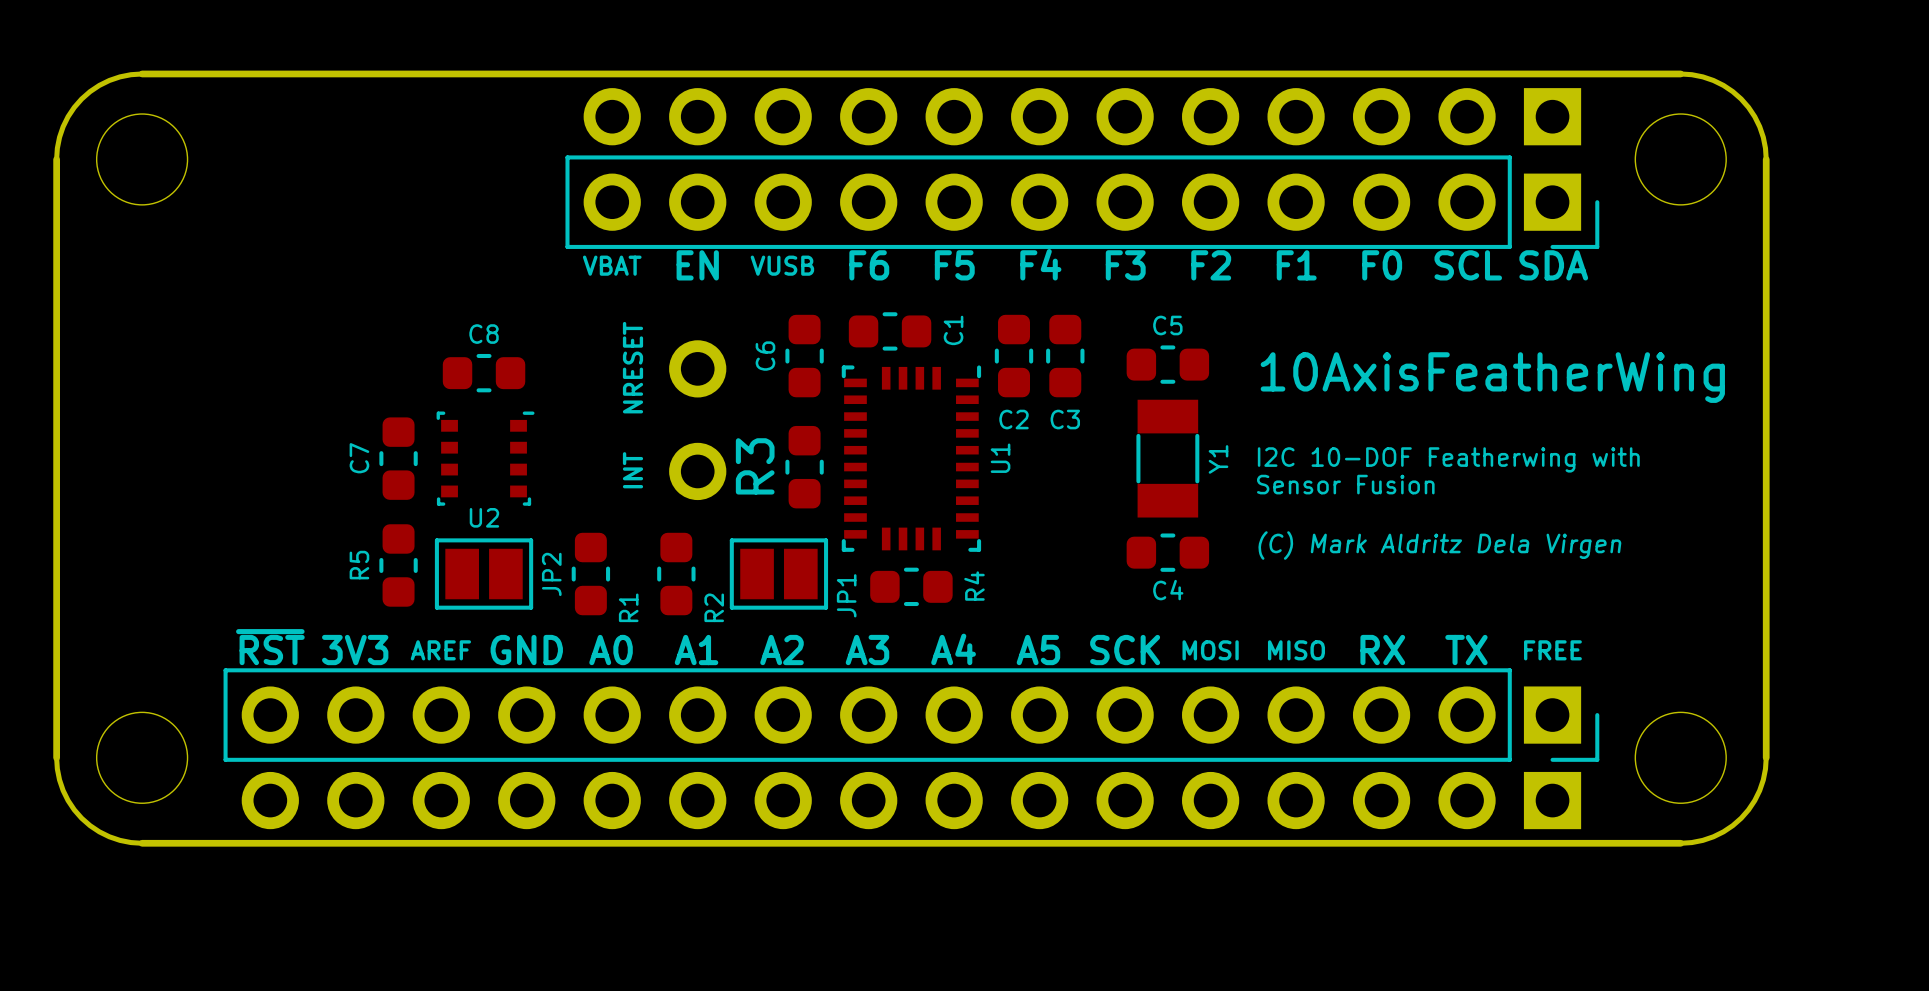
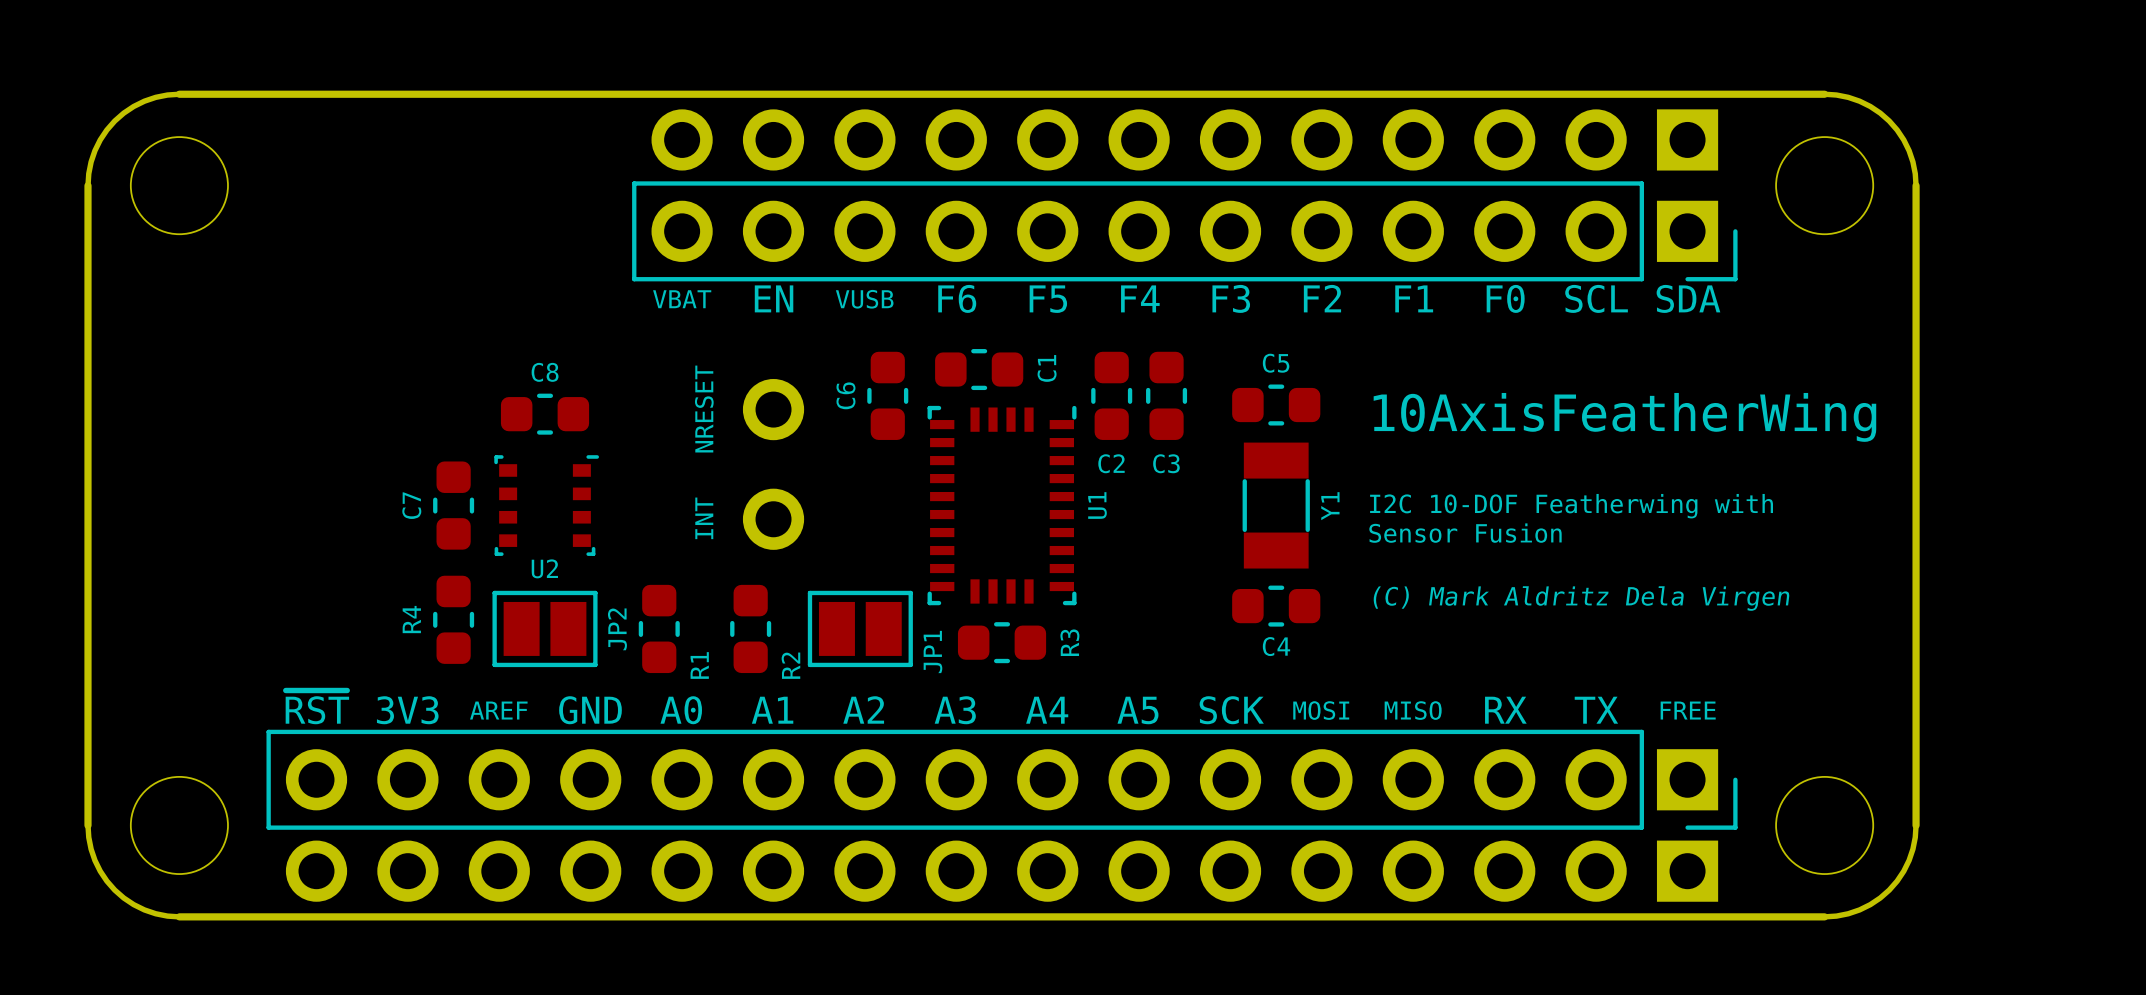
R3: (804, 467) -> none
R5 name: R5 (359, 565) -> R4 (411, 619)
R4 name: R4 (974, 586) -> R3 (1069, 642)

